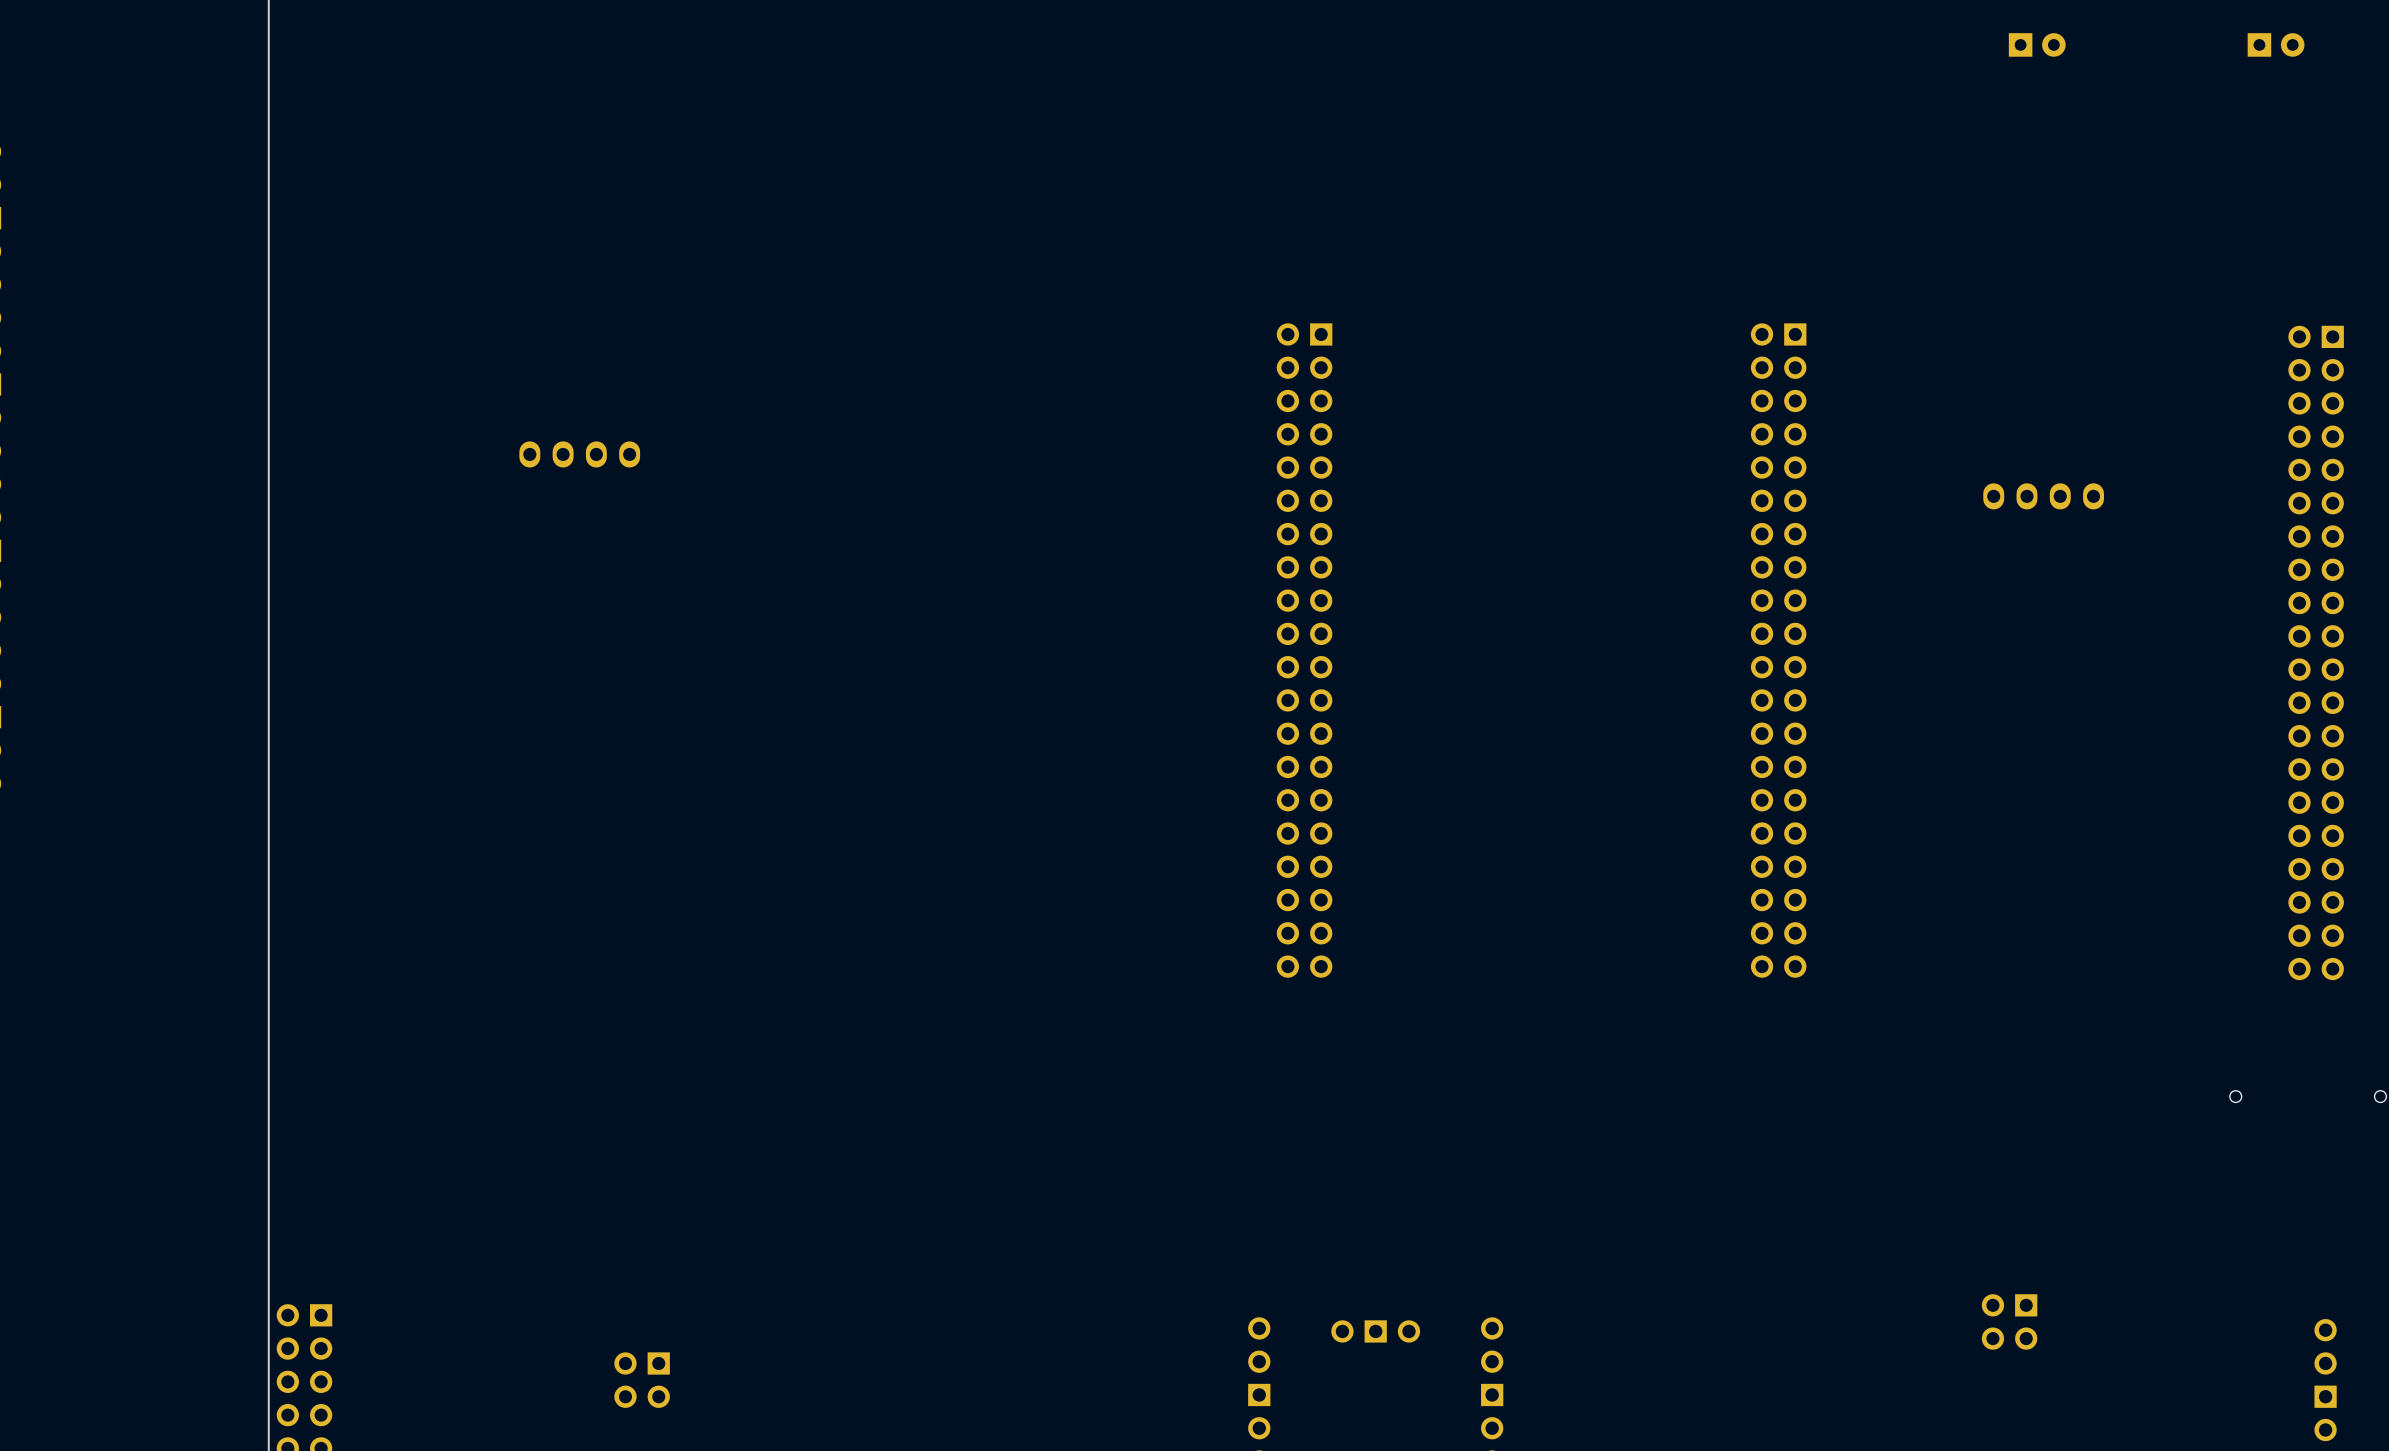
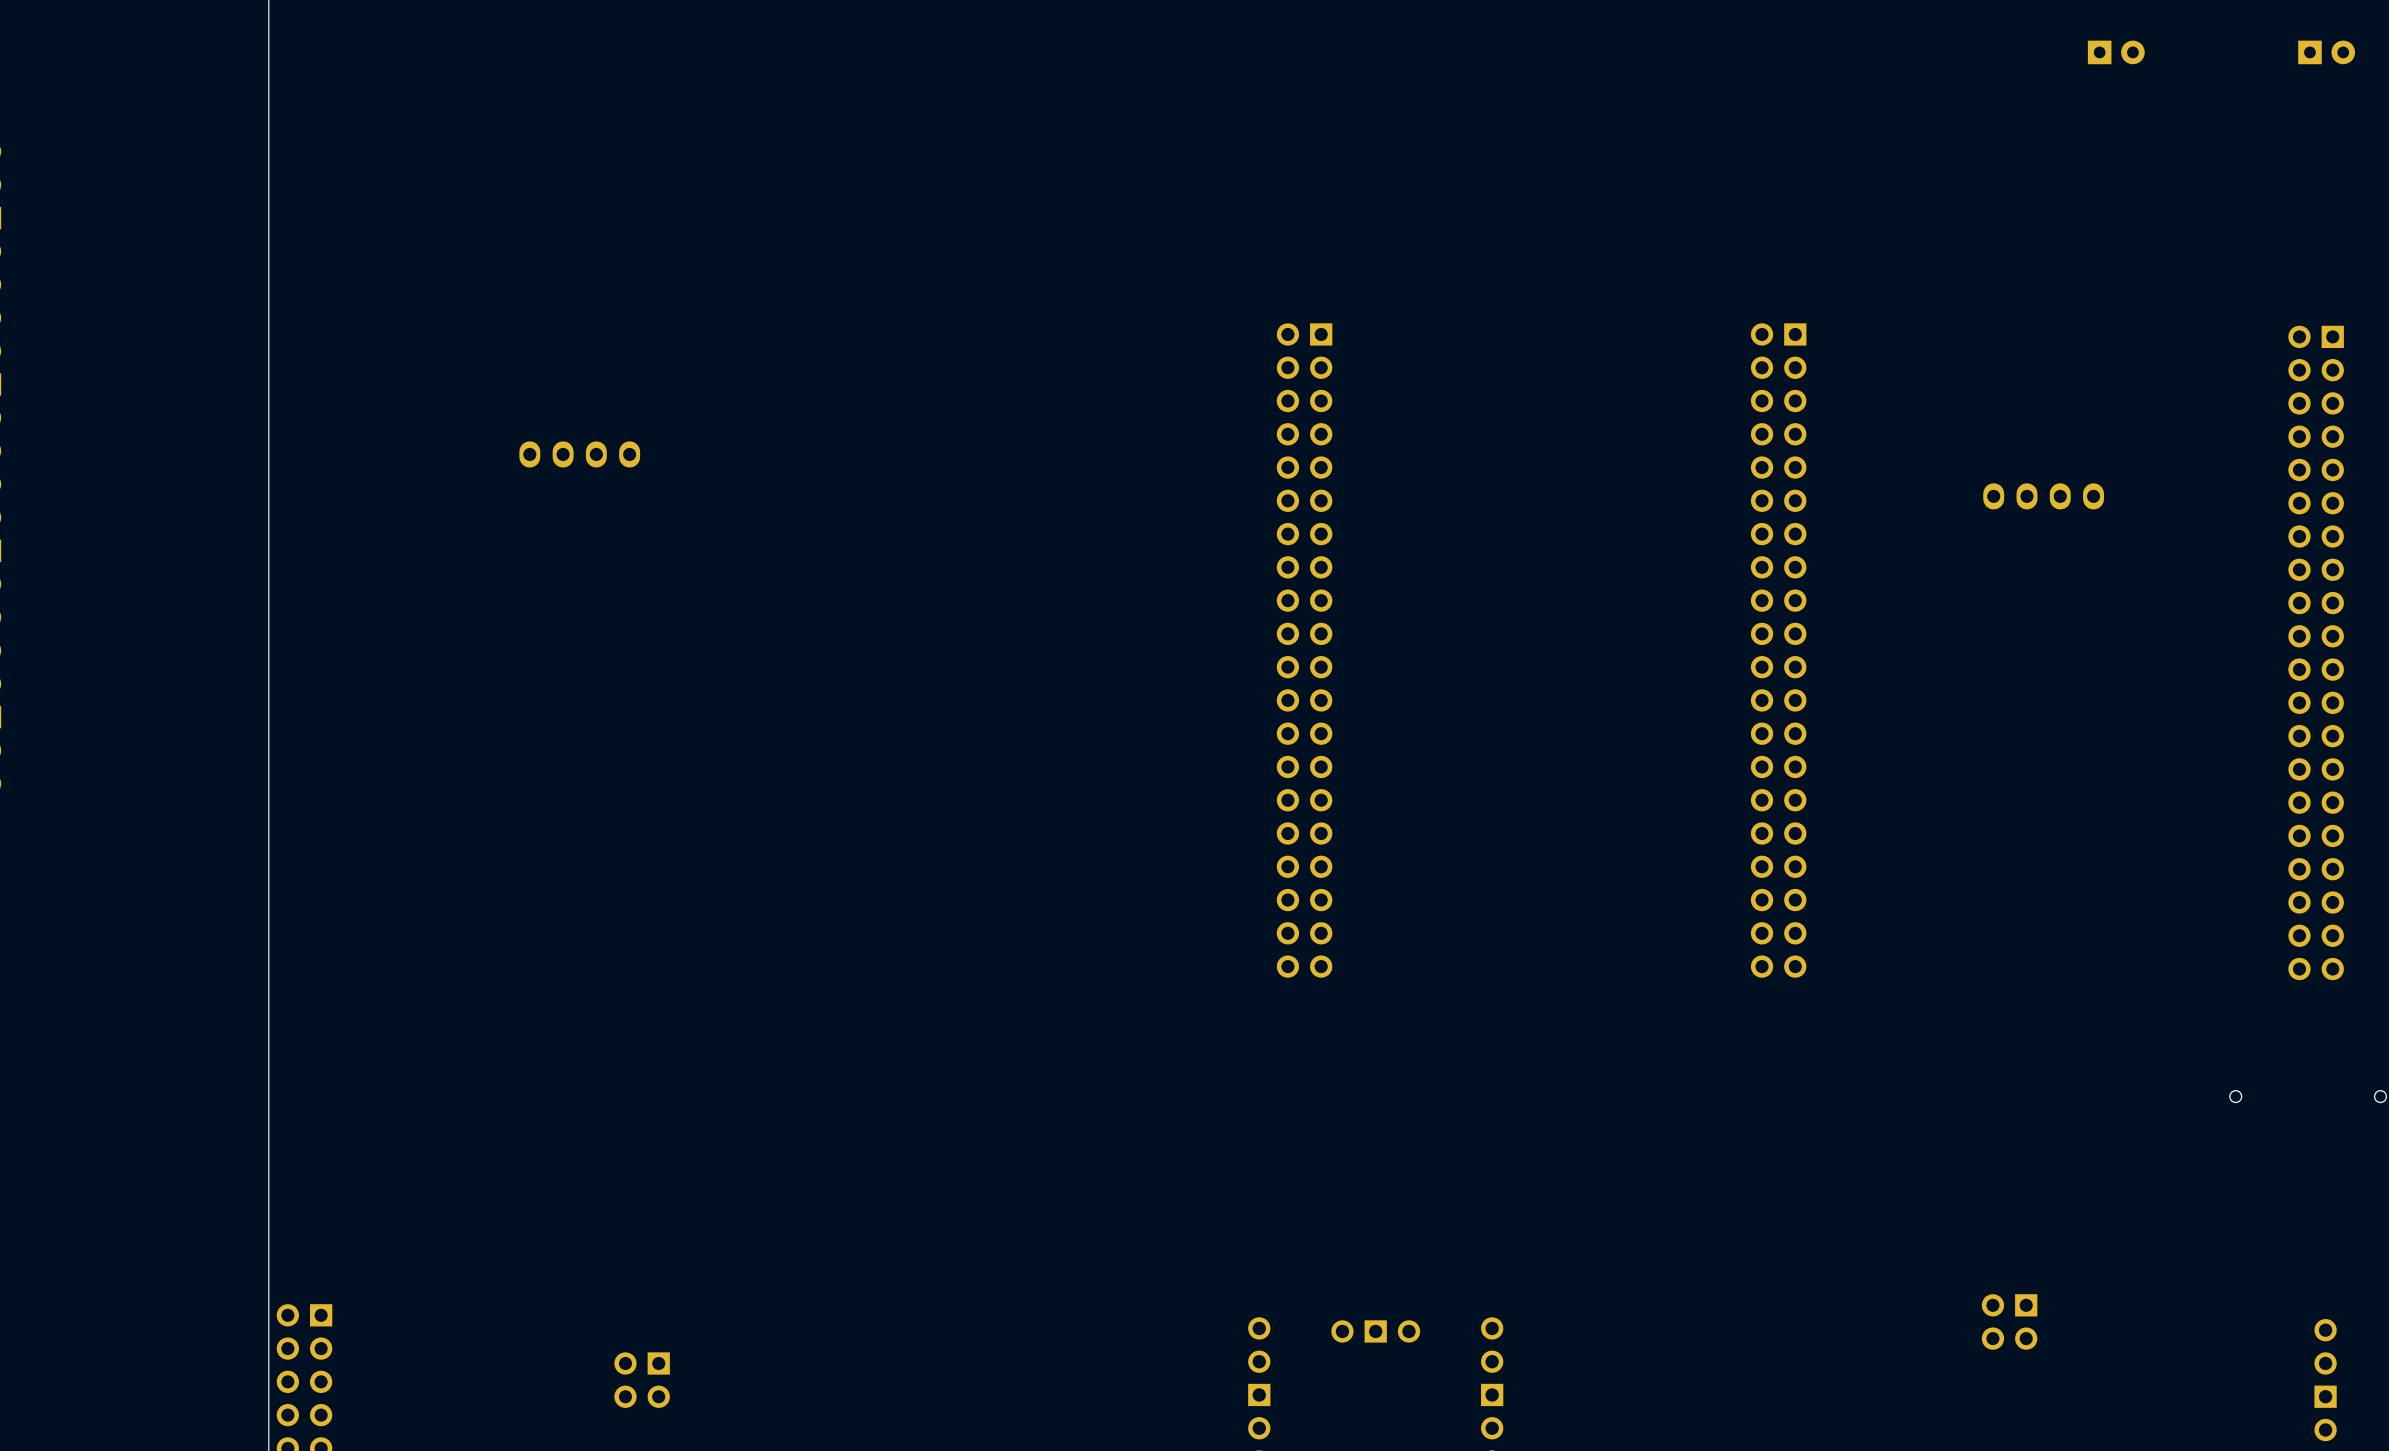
part position: (2037, 44) -> (2116, 52)
part position: (2276, 44) -> (2326, 52)

